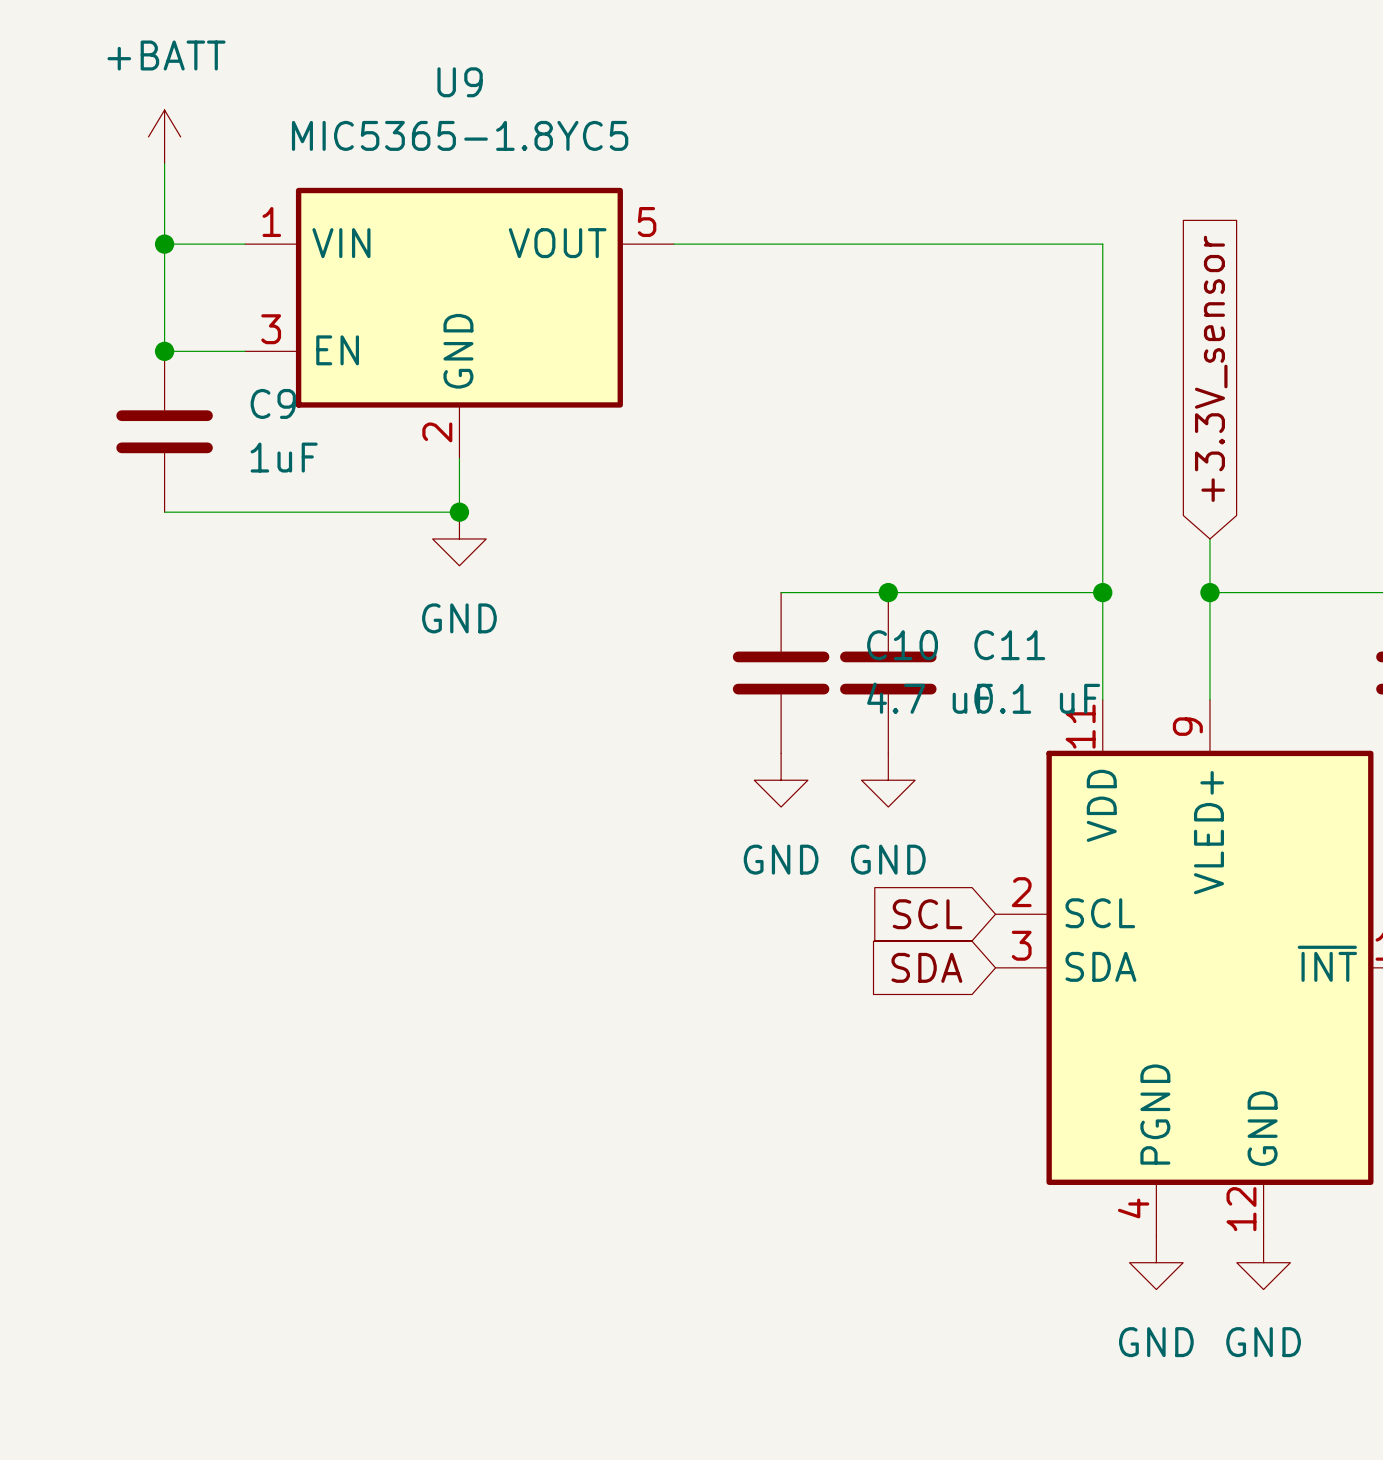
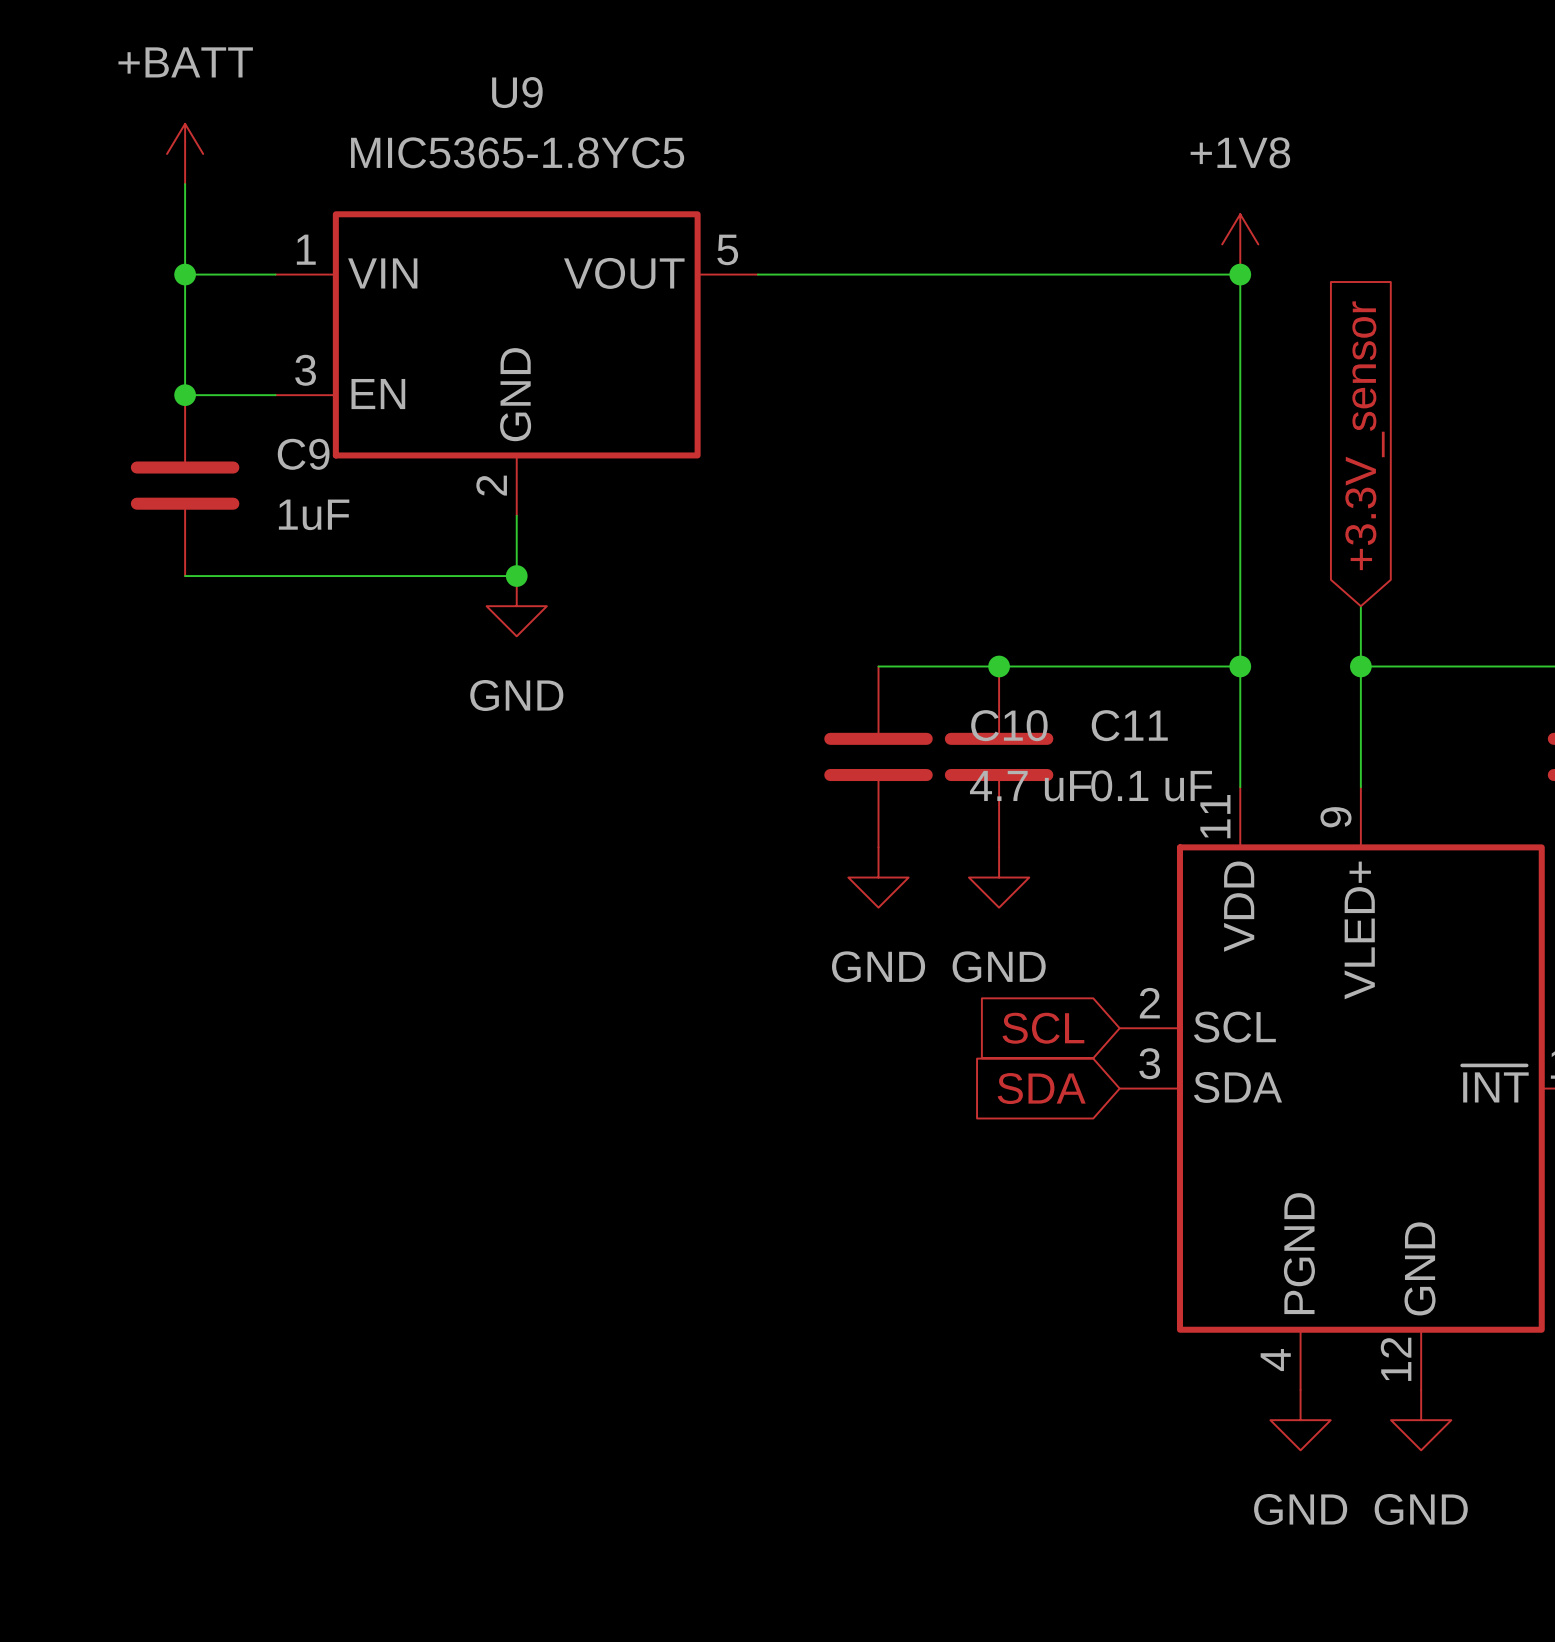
power symbol: none -> +1V8 (1240, 244)
junction: none -> (1240, 274)

